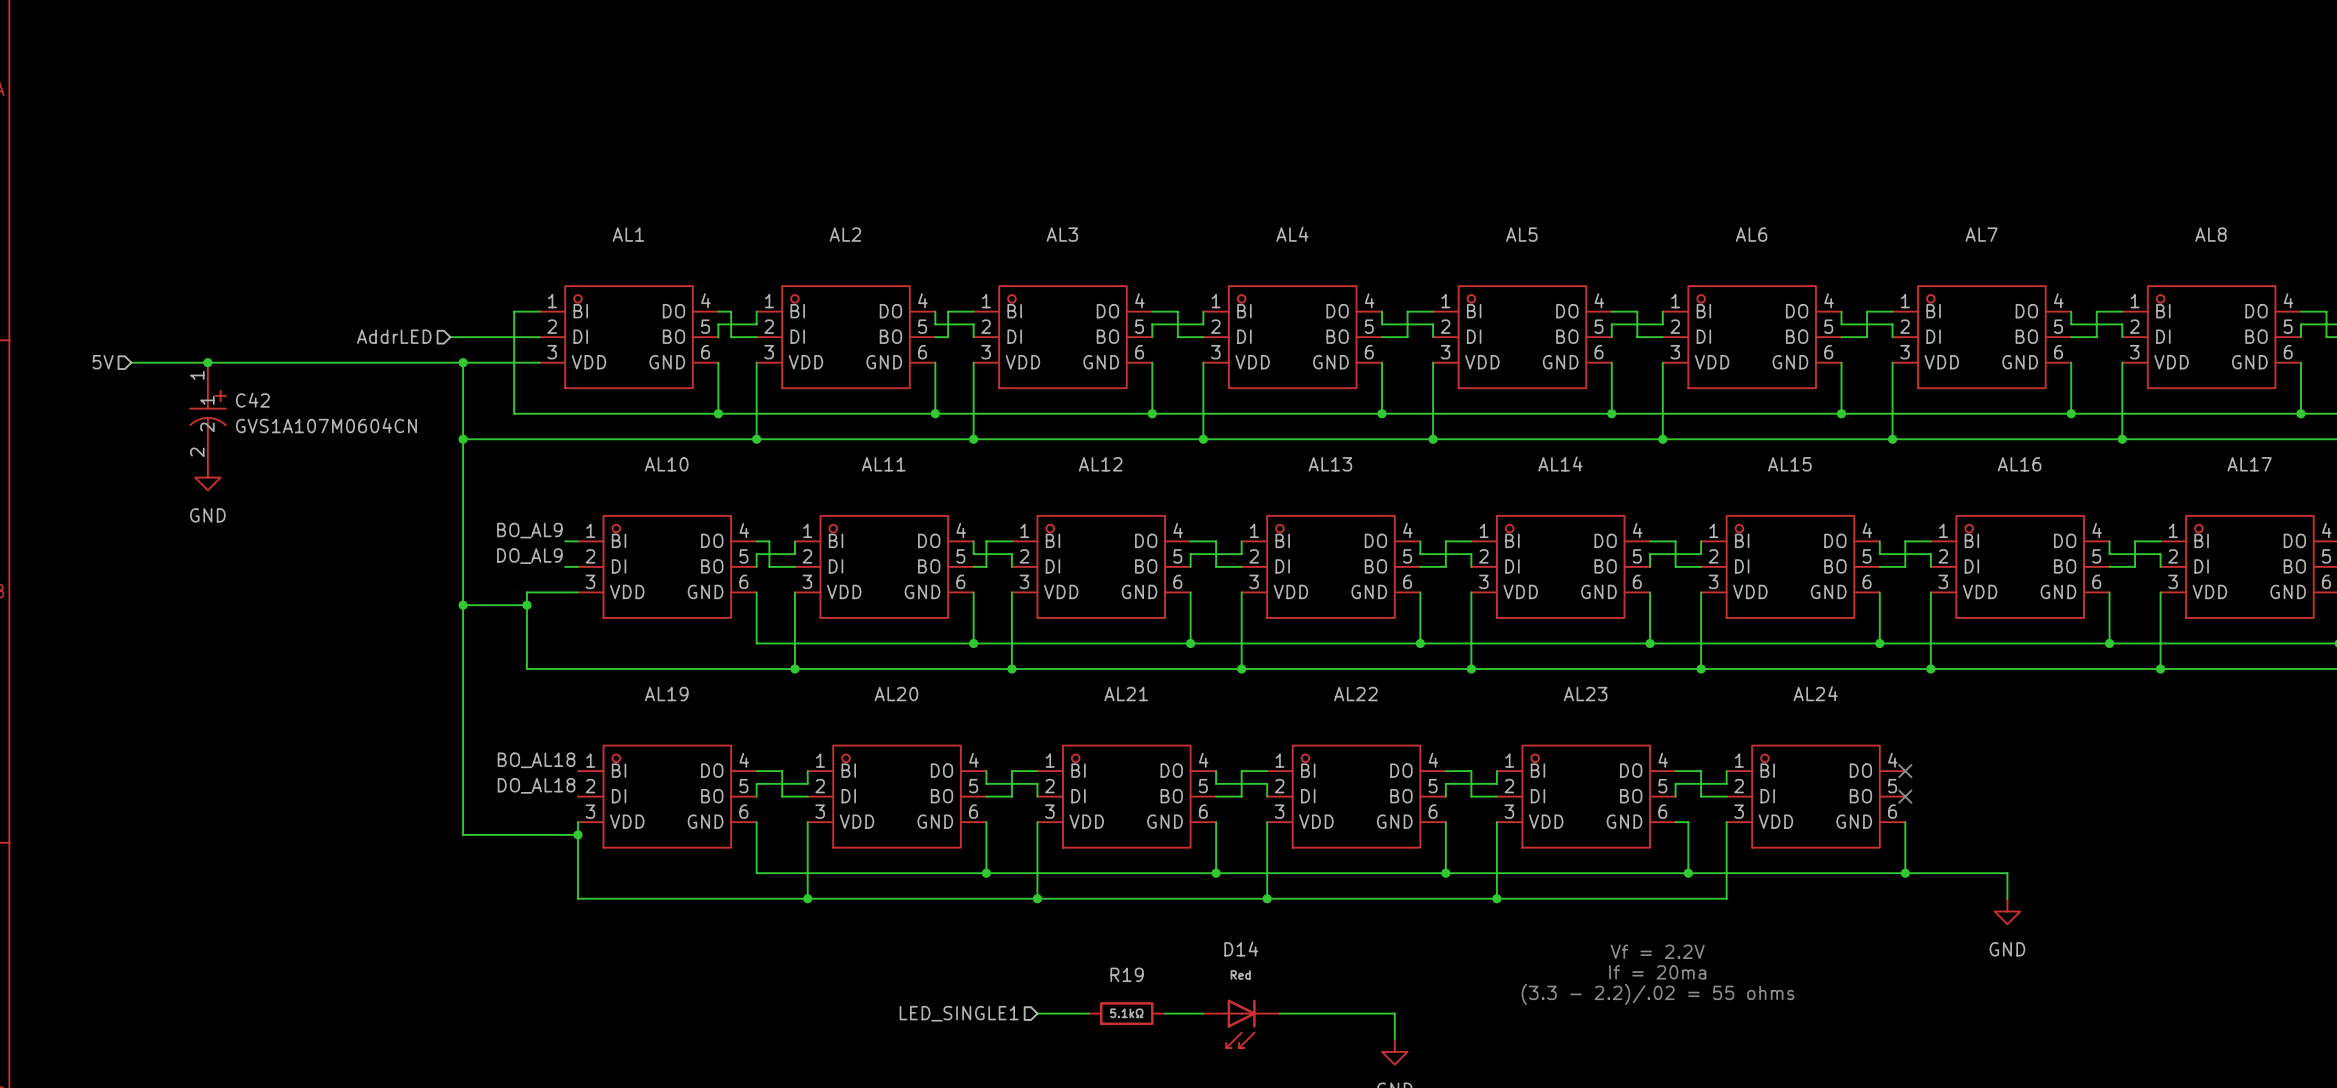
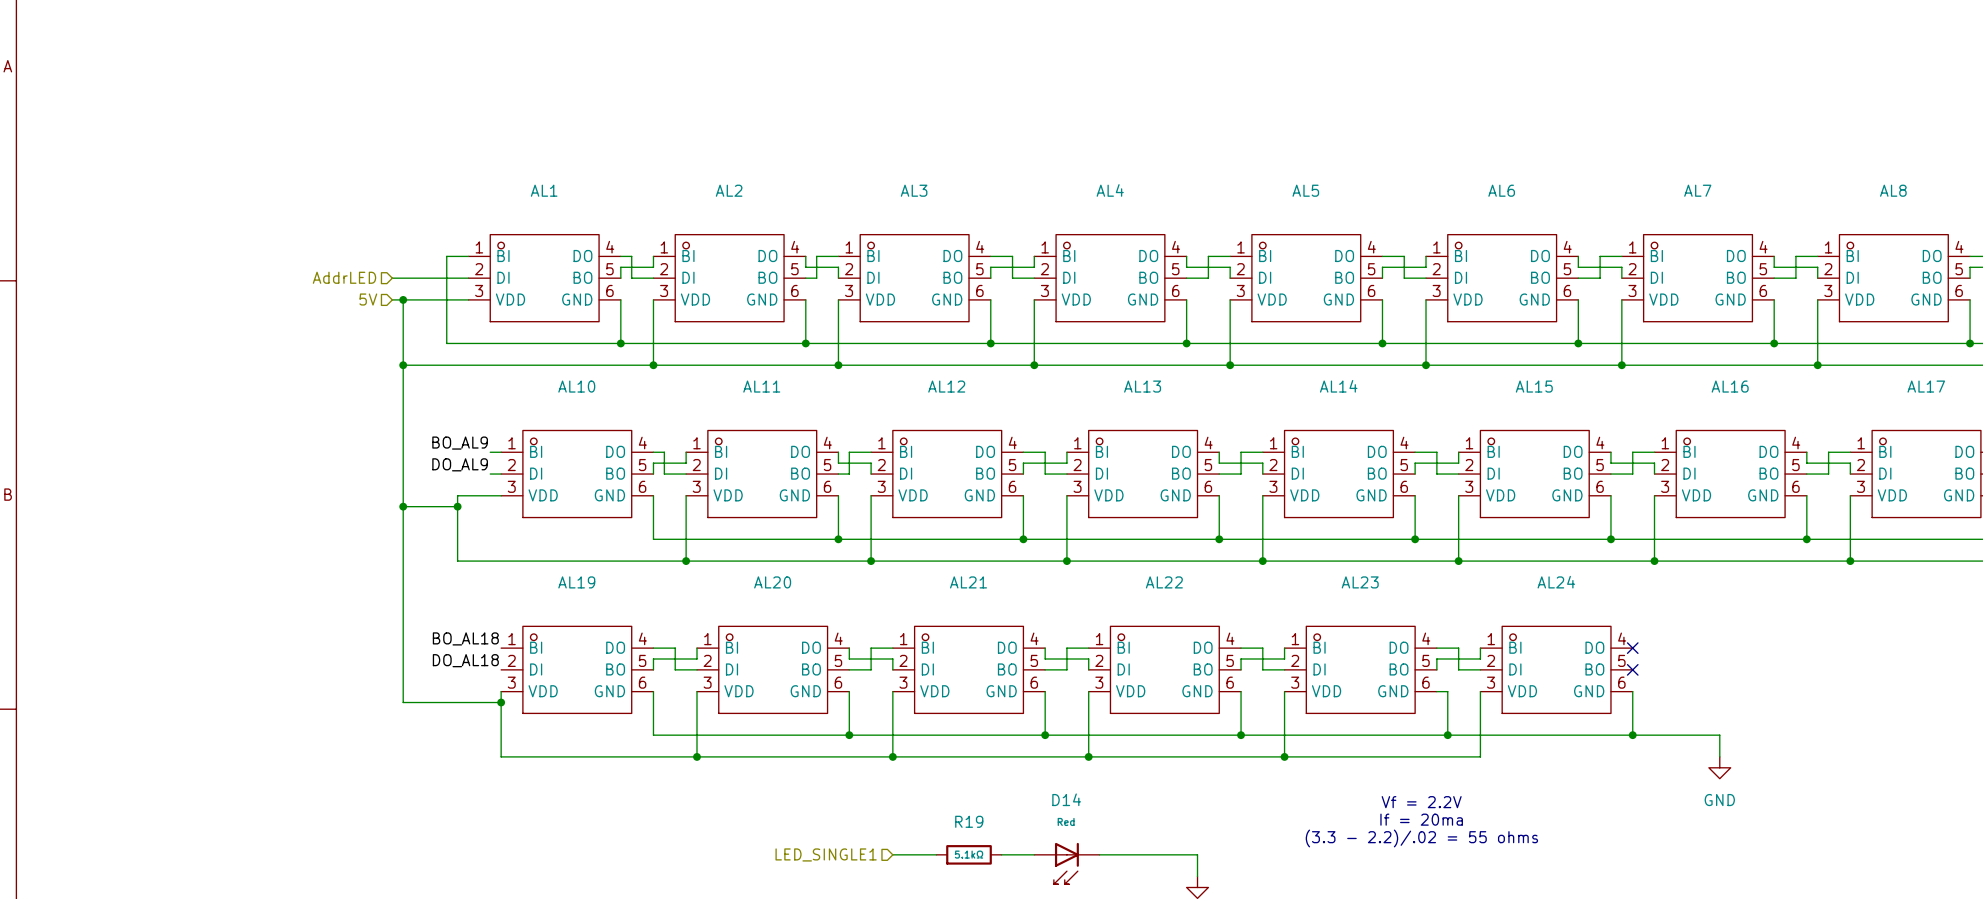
hierarchical label: 5V (103, 362) -> none
wire: (131, 362) (450, 362) -> none
junction: (207, 362) -> none
hierarchical label: none -> 5V (368, 299)
C42: GVS1A107M0604CN (207, 413) -> none
power symbol: GND (207, 477) -> none

